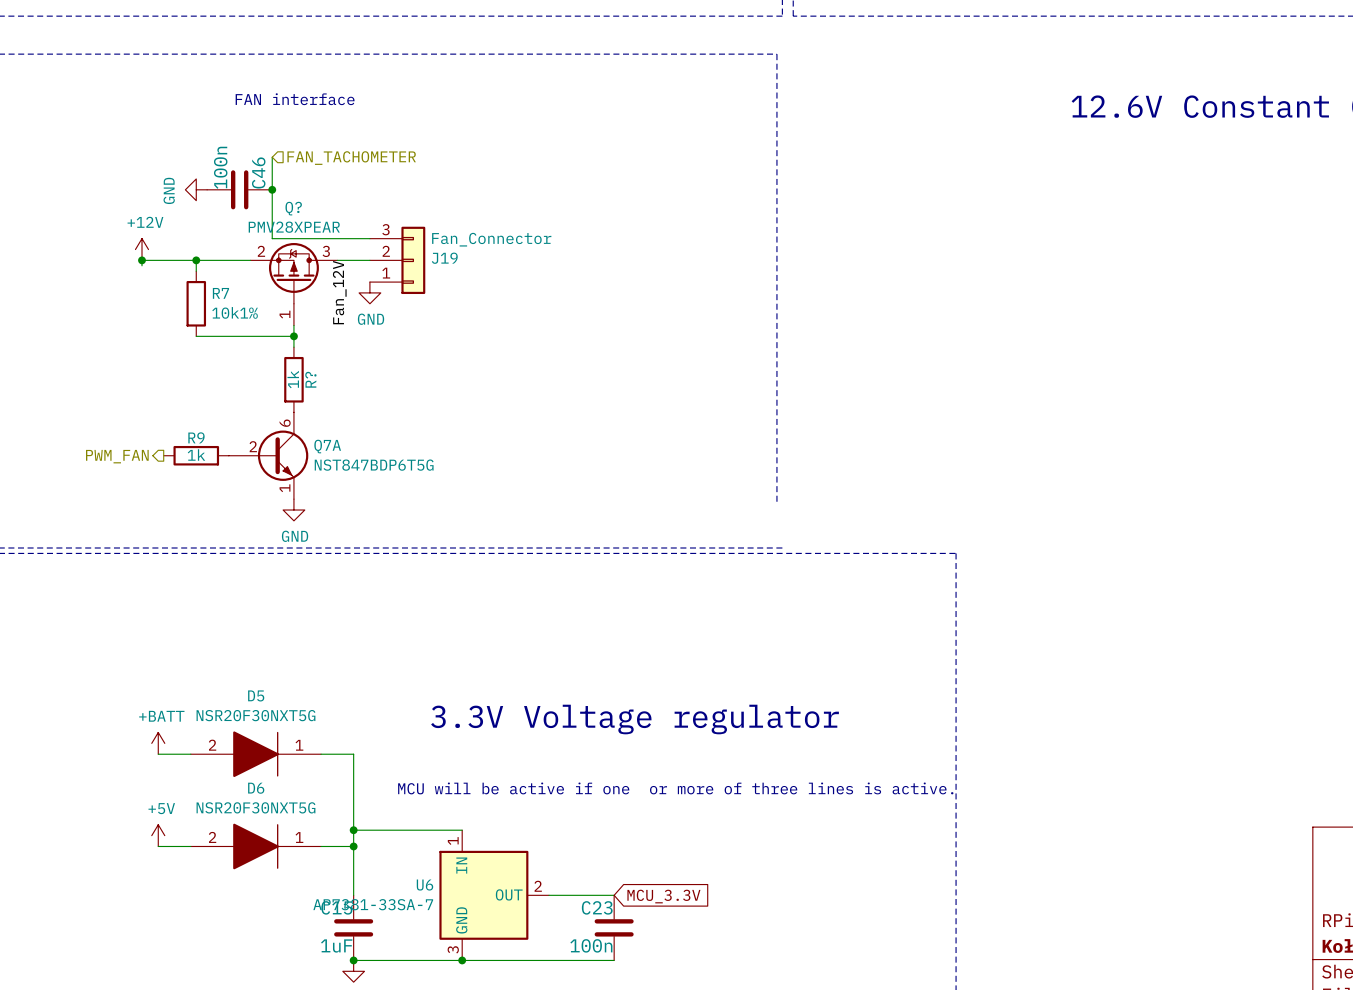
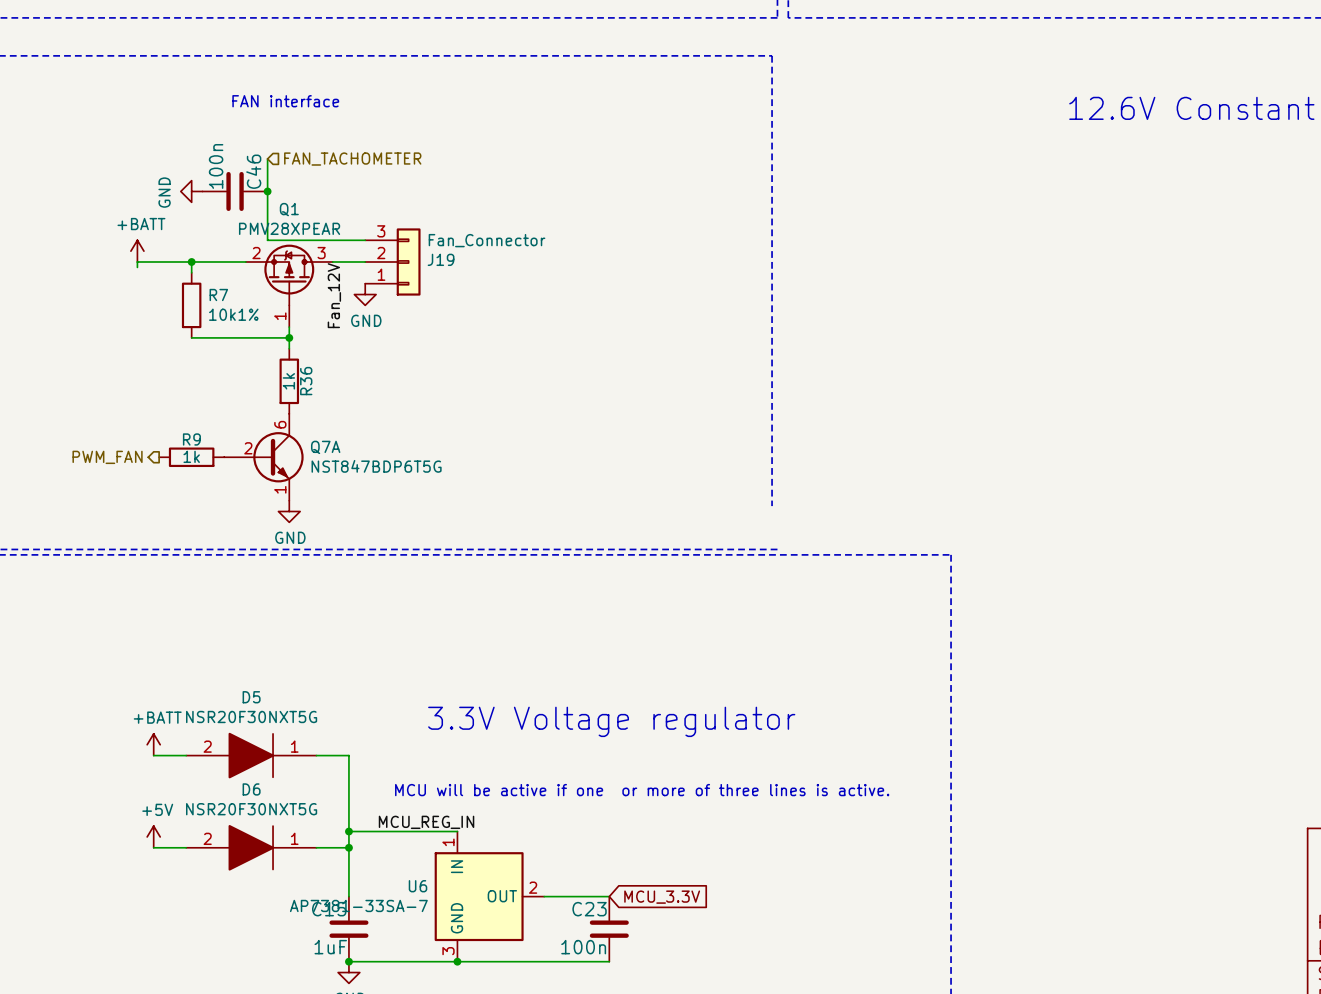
Q? name: Q? (293, 208) -> Q1 (289, 209)
power symbol: +12V (142, 249) -> +BATT (137, 251)
junction: (142, 260) -> none
R? name: R? (310, 379) -> R36 (306, 381)
label: none -> MCU_REG_IN (426, 822)

